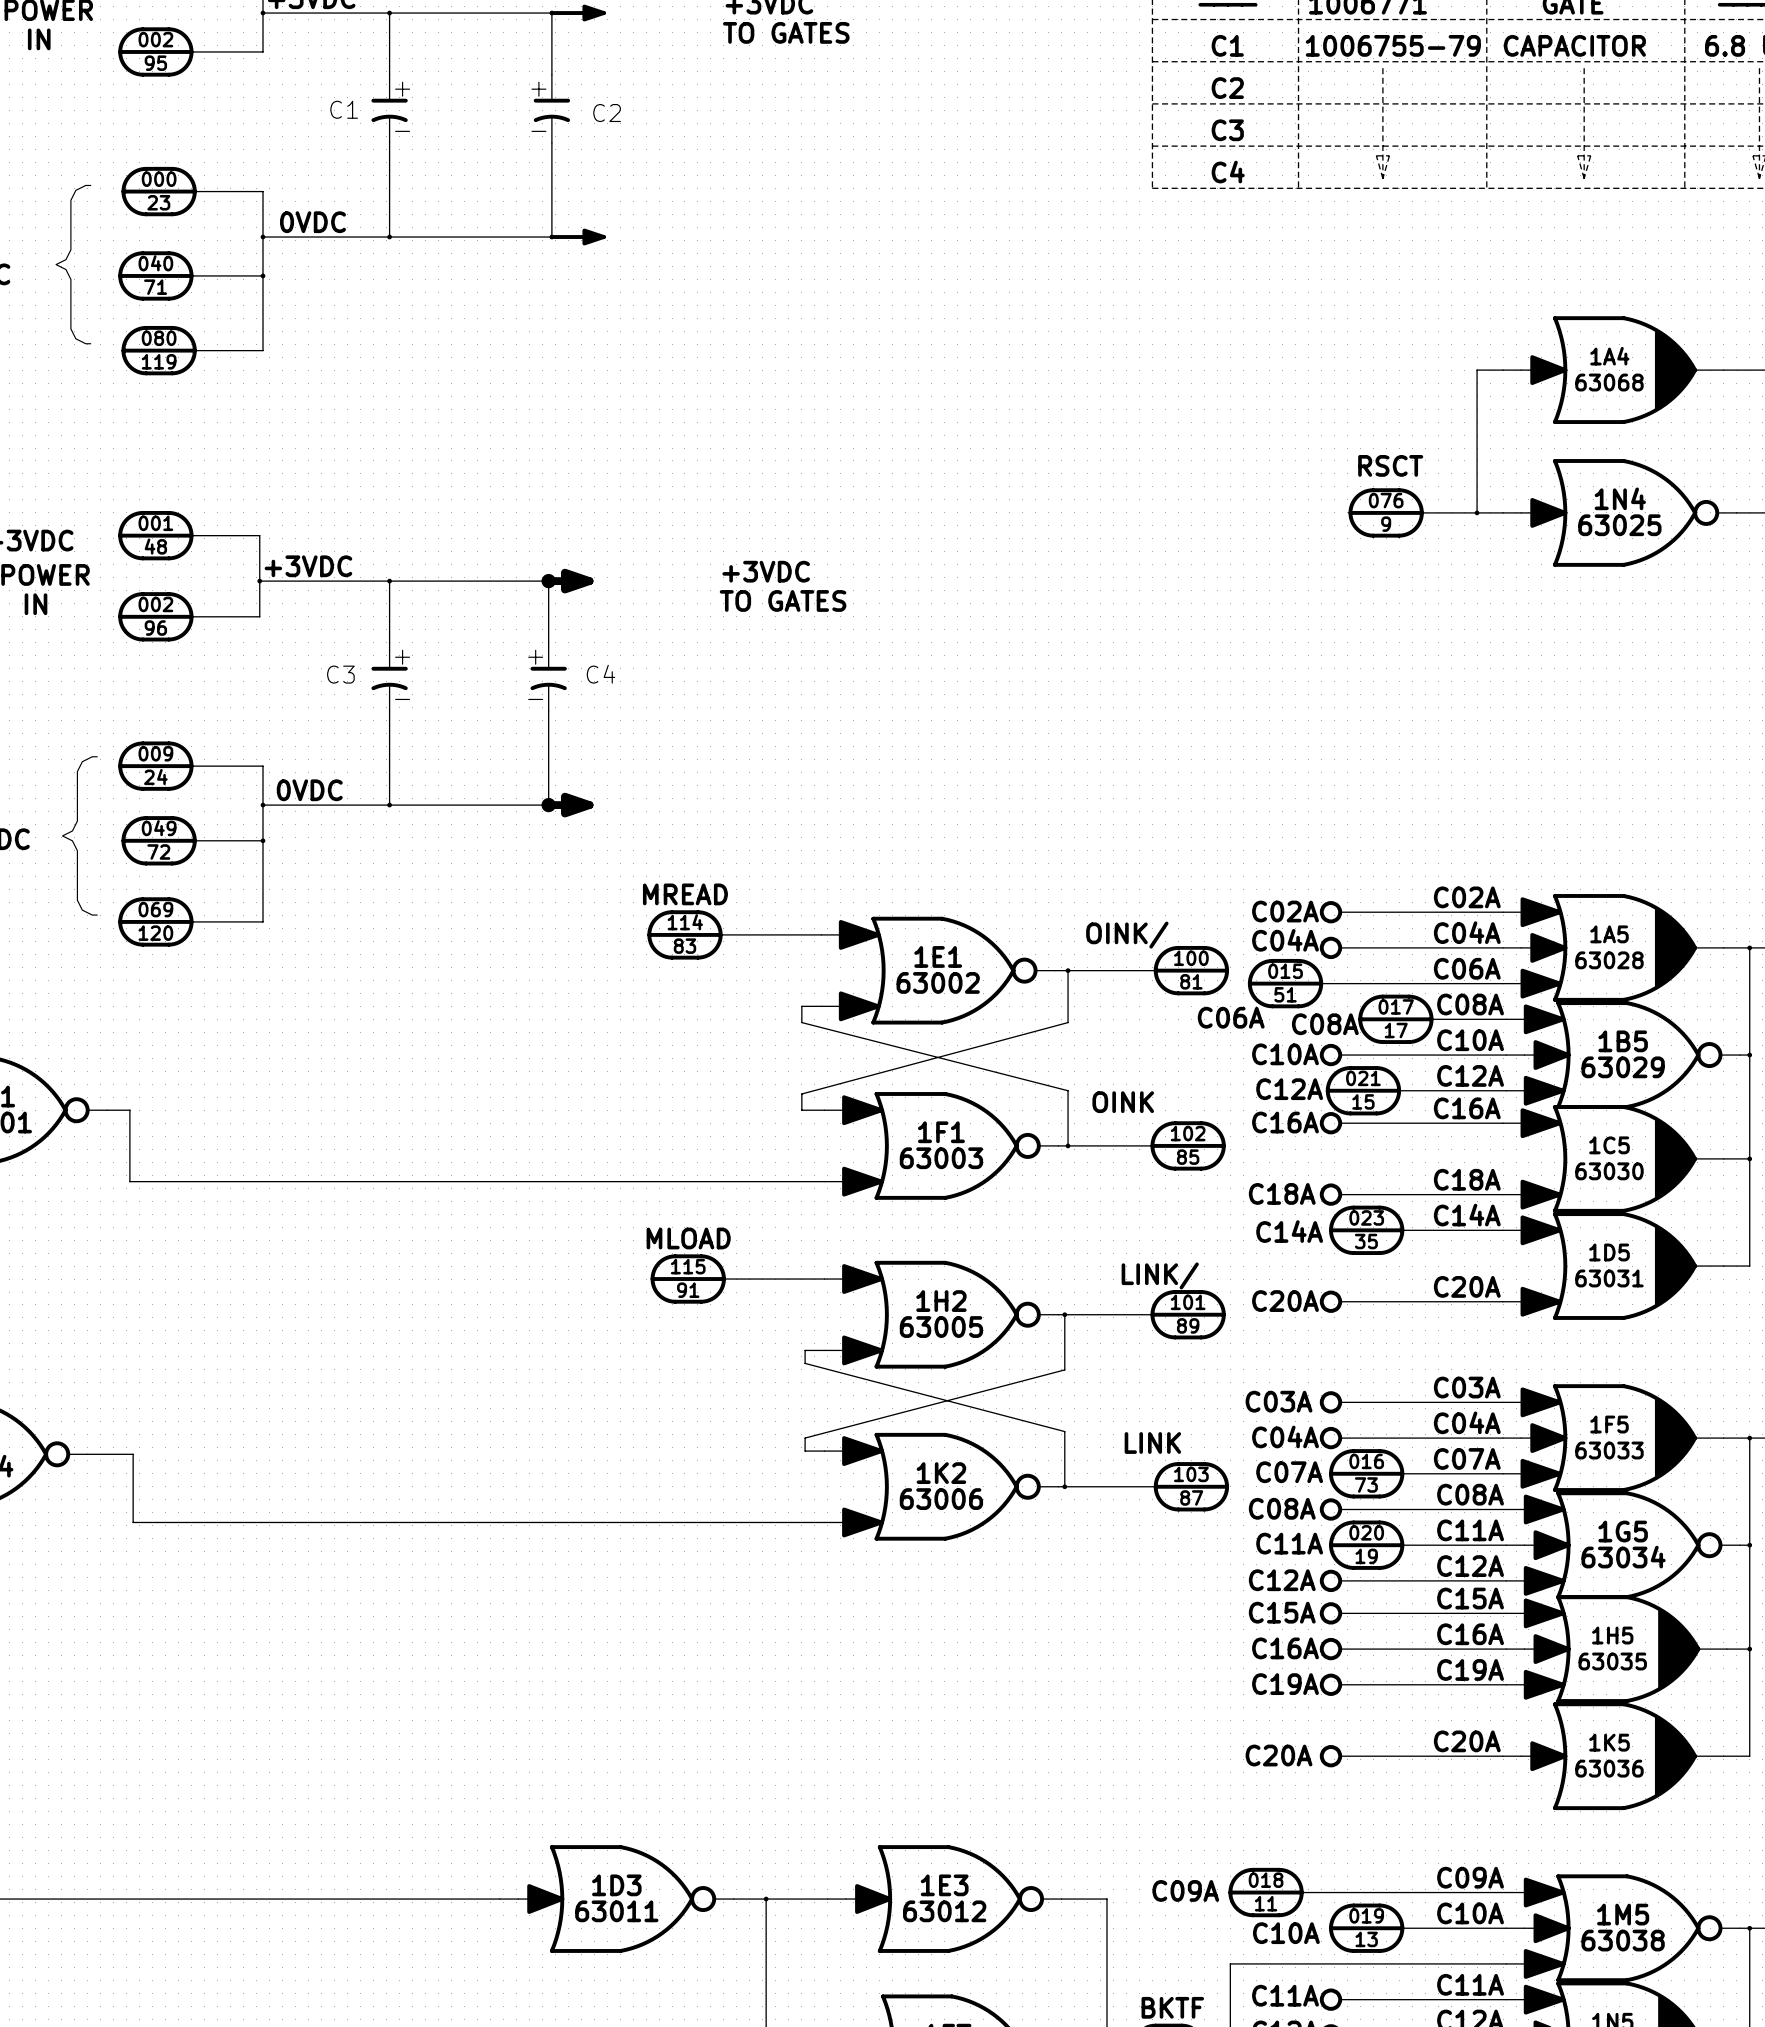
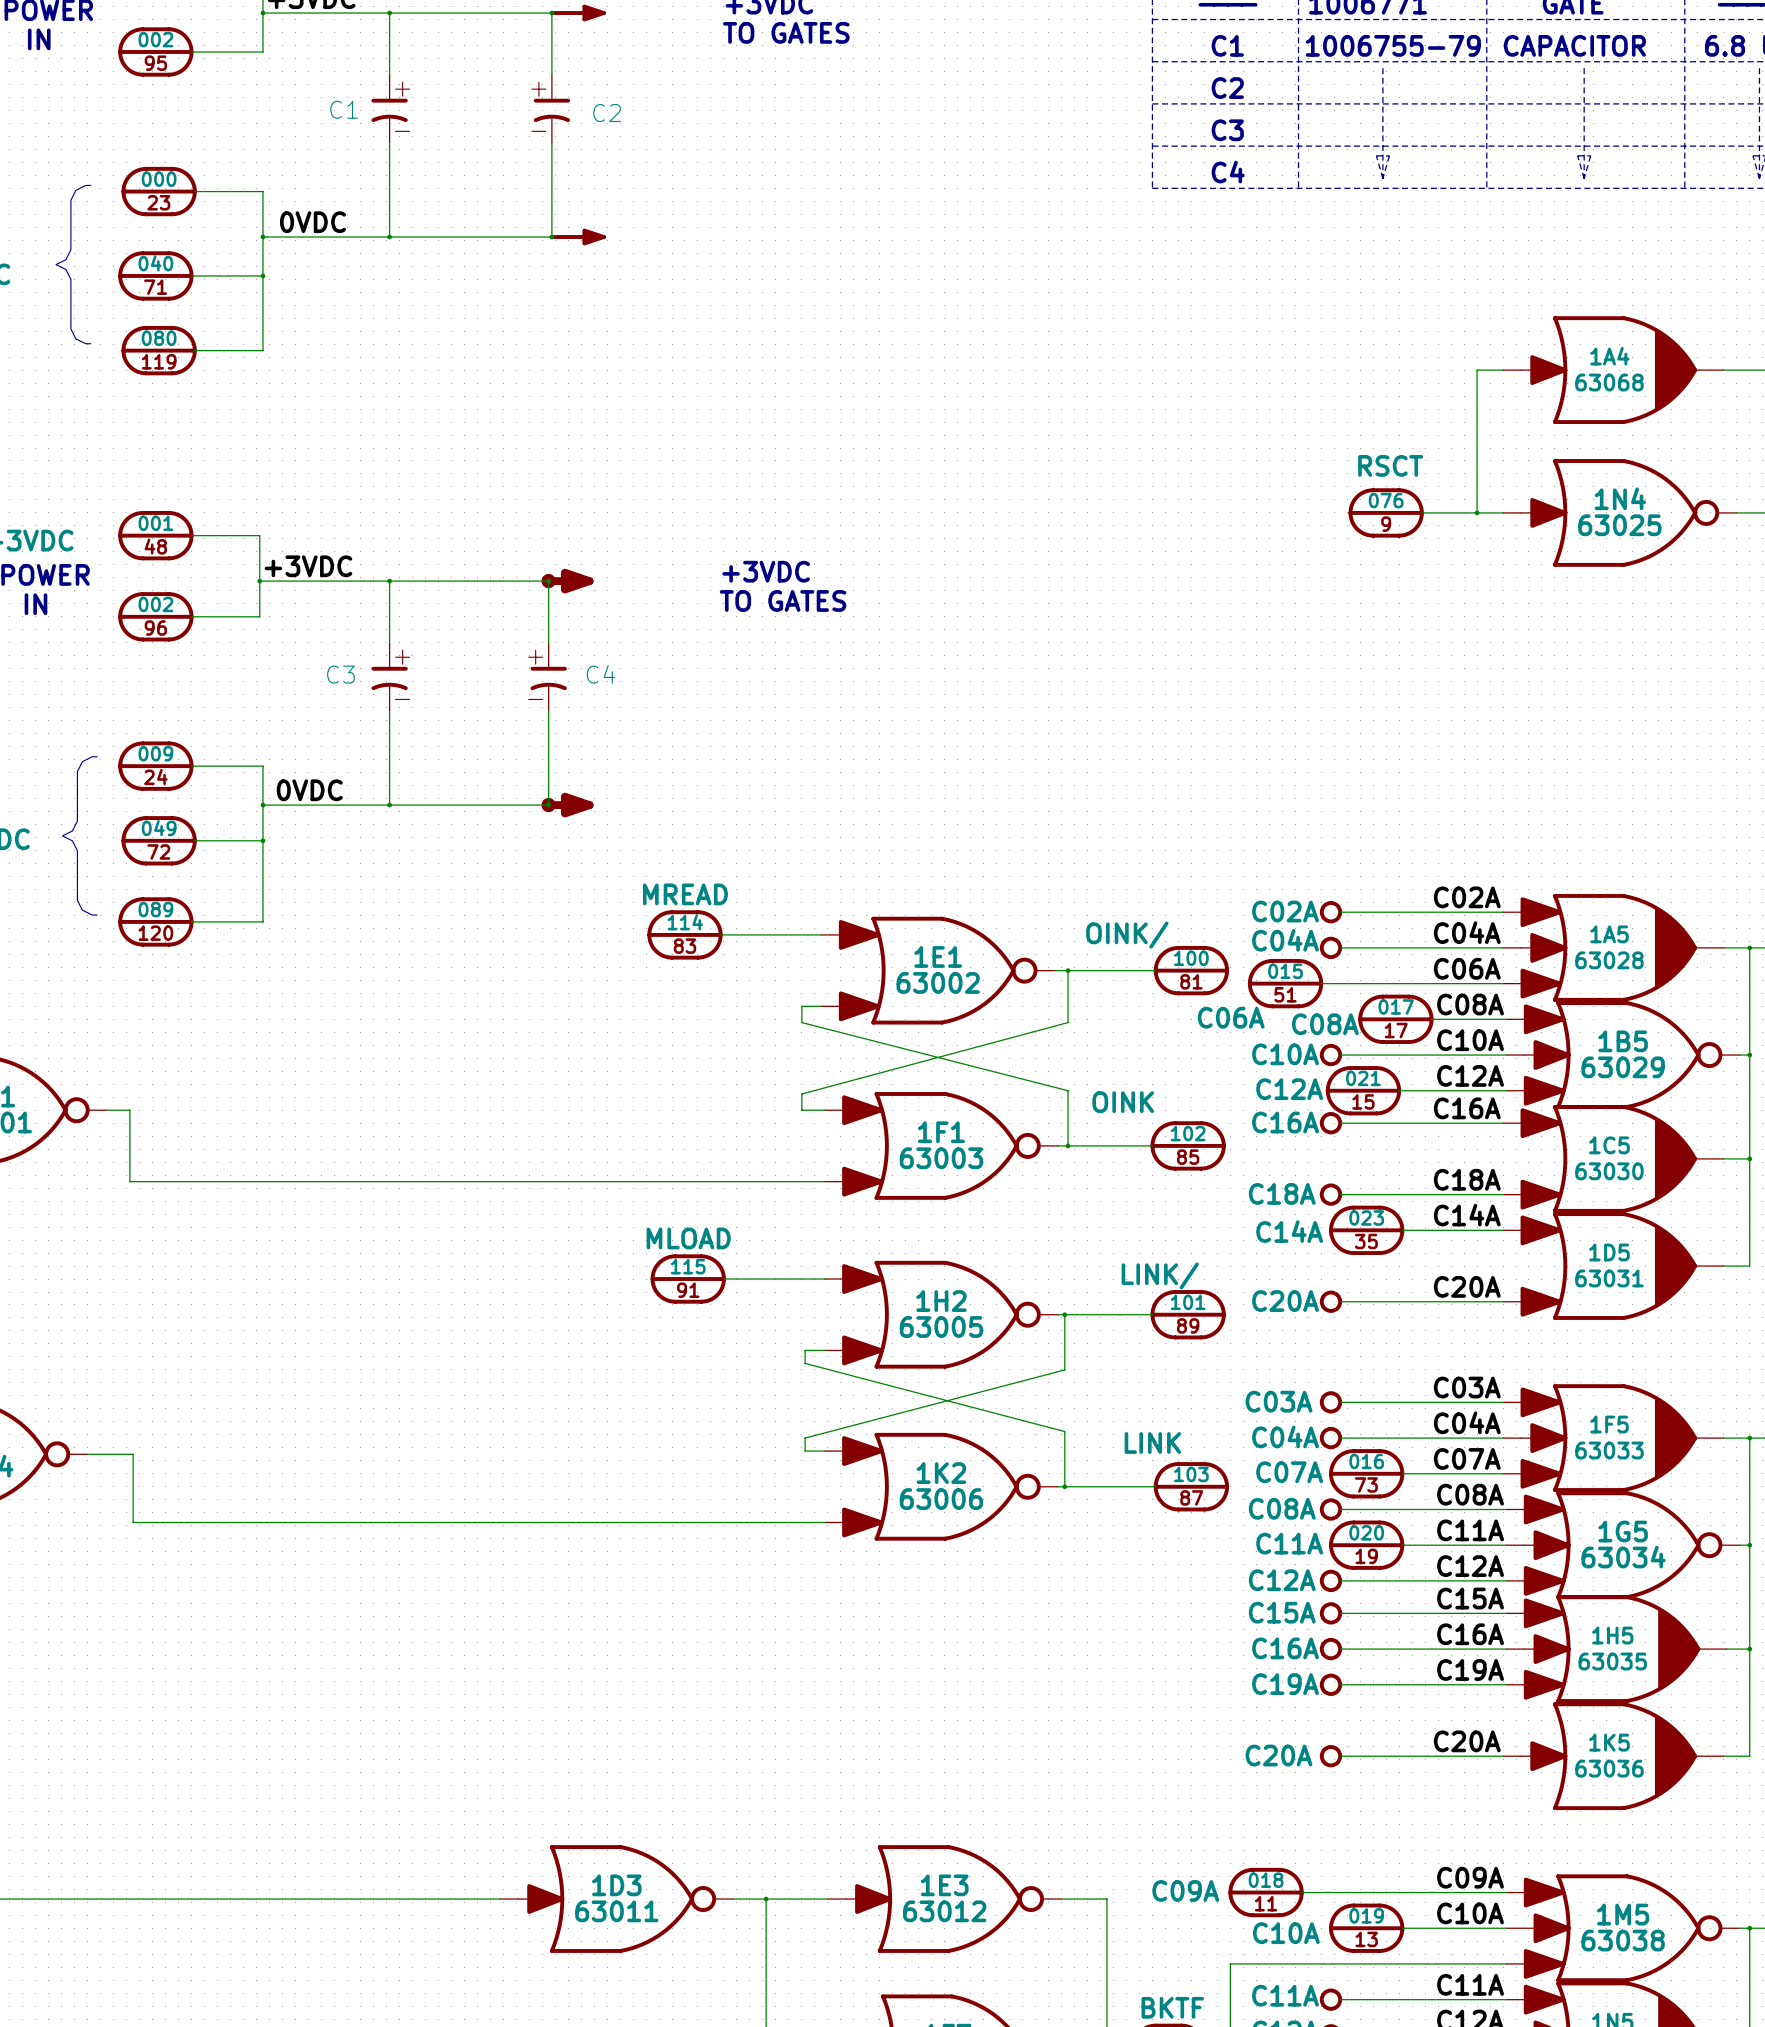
part text: 069 (155, 909) -> 089 (155, 909)

